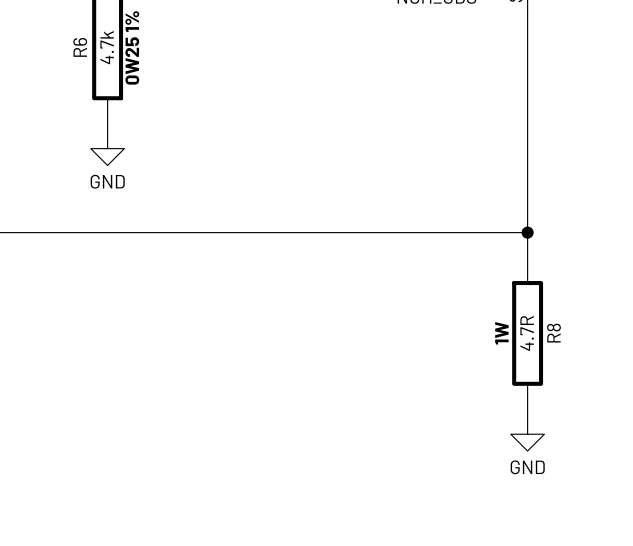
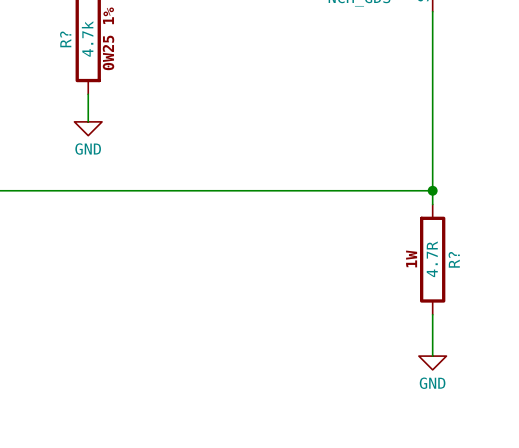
R6 name: R6 (80, 47) -> R? (65, 39)
R?: none -> 4.7R (432, 259)
R8: 4.7R (527, 333) -> none

